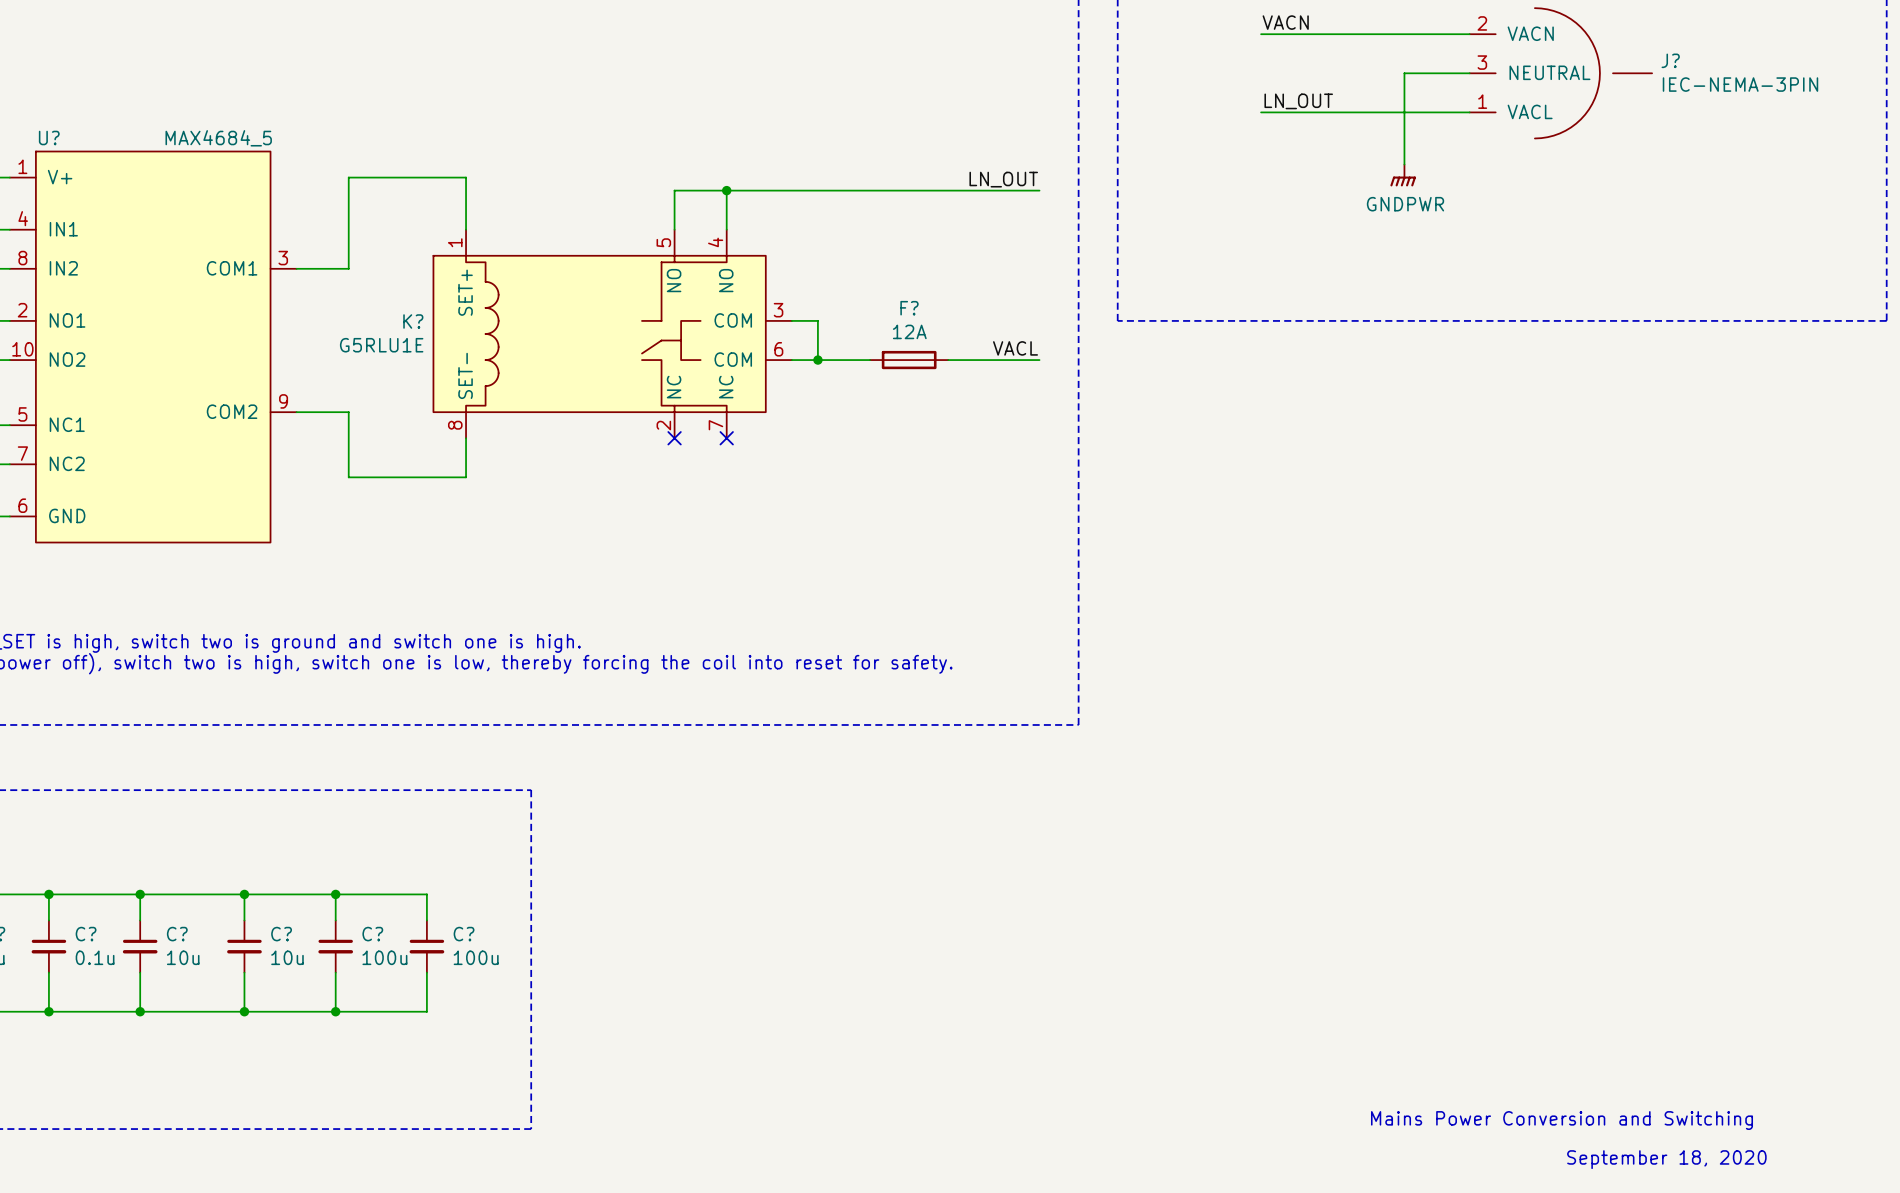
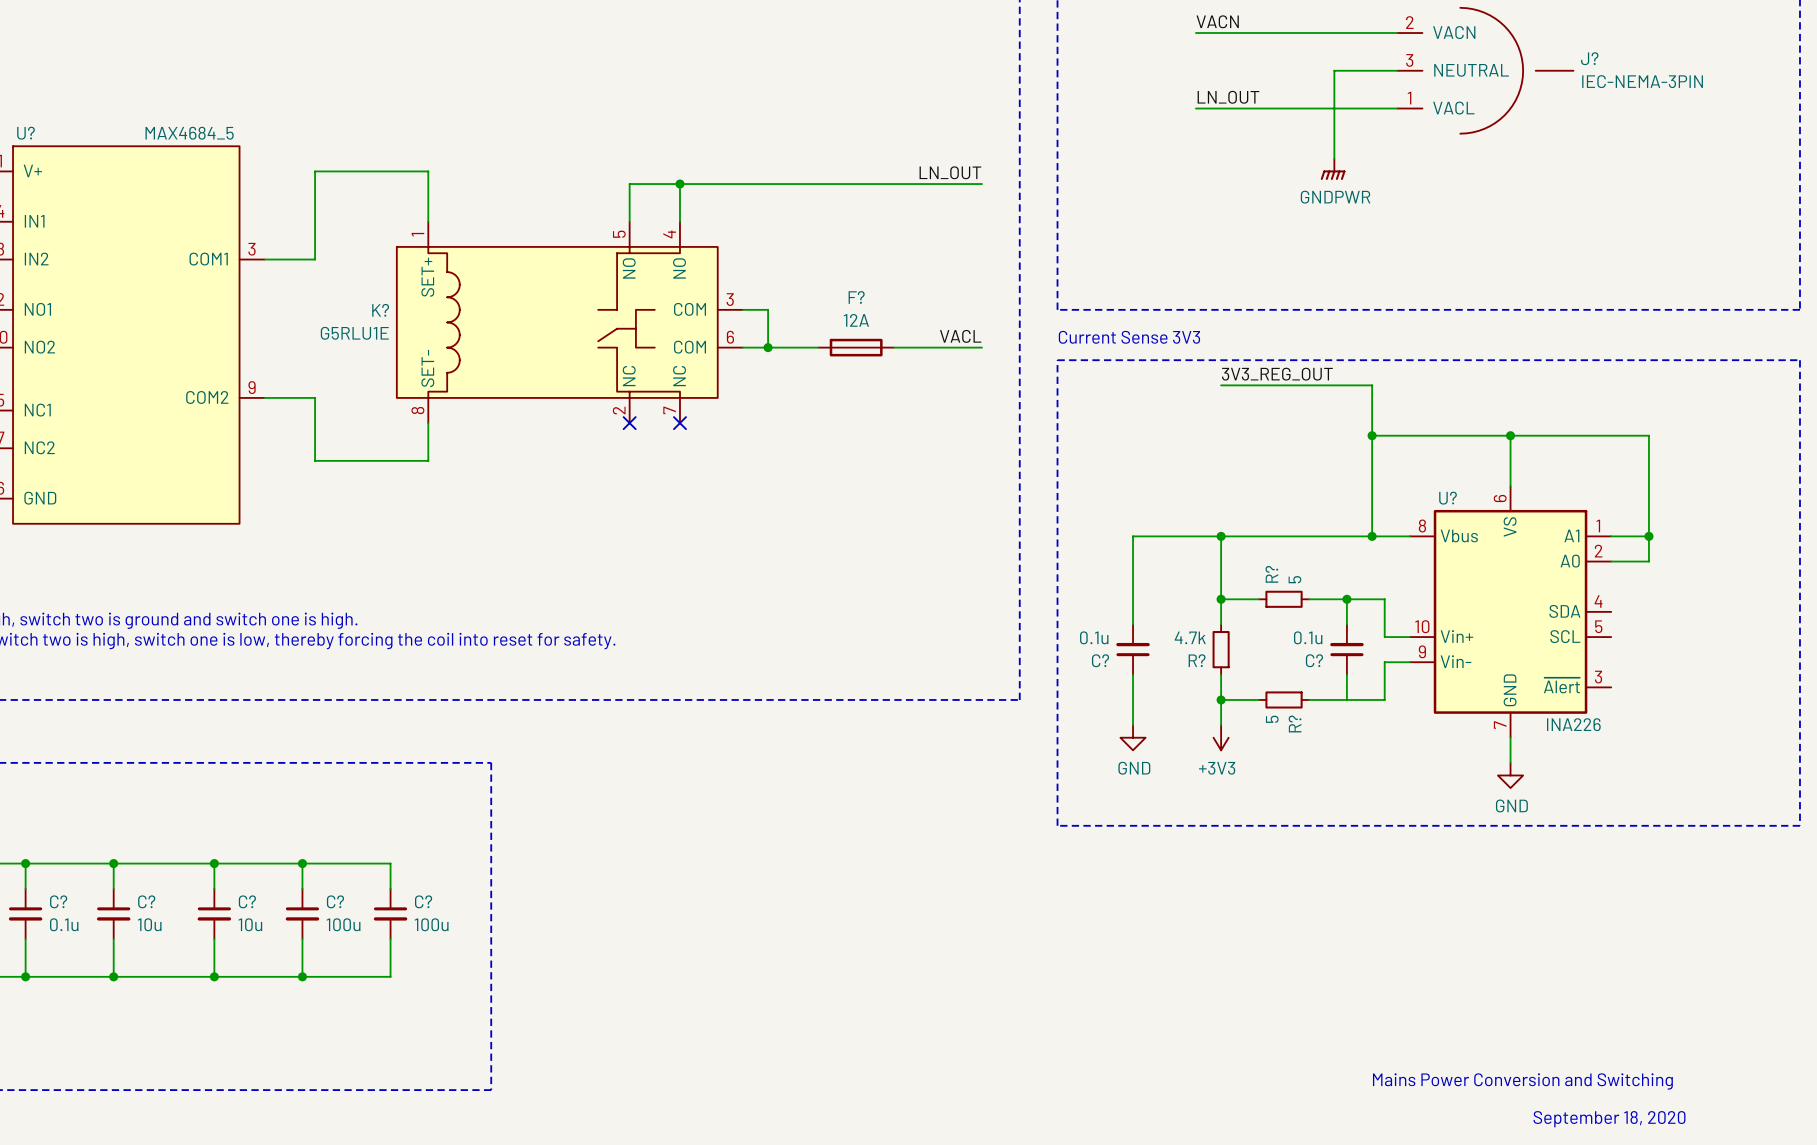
text: none -> Current Sense 3V3 (1129, 337)
line: none -> (1057, 360) (1799, 360) (1799, 825) (1057, 825) (1057, 360)
label: none -> 3V3_REG_OUT (1277, 374)
wire: none -> (1221, 385) (1372, 385) (1372, 536)
wire: none -> (1372, 435) (1648, 435) (1648, 561) (1611, 561)
junction: none -> (1372, 435)
wire: none -> (1510, 435) (1510, 486)
junction: none -> (1510, 435)
wire: none -> (1221, 536) (1221, 624)
junction: none -> (1221, 536)
junction: none -> (1372, 536)
wire: none -> (1409, 536) (1133, 536) (1133, 624)
wire: none -> (1611, 536) (1648, 536)
junction: none -> (1648, 536)
wire: none -> (1221, 599) (1258, 599)
junction: none -> (1221, 599)
R?: none -> 5 (1284, 599)
wire: none -> (1309, 599) (1384, 599) (1384, 637) (1409, 637)
wire: none -> (1346, 599) (1346, 624)
junction: none -> (1346, 599)
U?: none -> INA226 (1510, 611)
C?: none -> 0.1u (1133, 649)
R?: none -> 4.7k (1221, 649)
C?: none -> 0.1u (1346, 649)
wire: none -> (1409, 662) (1384, 662) (1384, 699) (1309, 699)
wire: none -> (1133, 674) (1133, 725)
wire: none -> (1221, 674) (1221, 725)
wire: none -> (1346, 674) (1346, 699)
wire: none -> (1221, 699) (1258, 699)
junction: none -> (1221, 699)
R?: none -> 5 (1284, 699)
power symbol: none -> GND (1133, 737)
power symbol: none -> +3V3 (1221, 737)
wire: none -> (1510, 737) (1510, 762)
power symbol: none -> GND (1510, 775)

